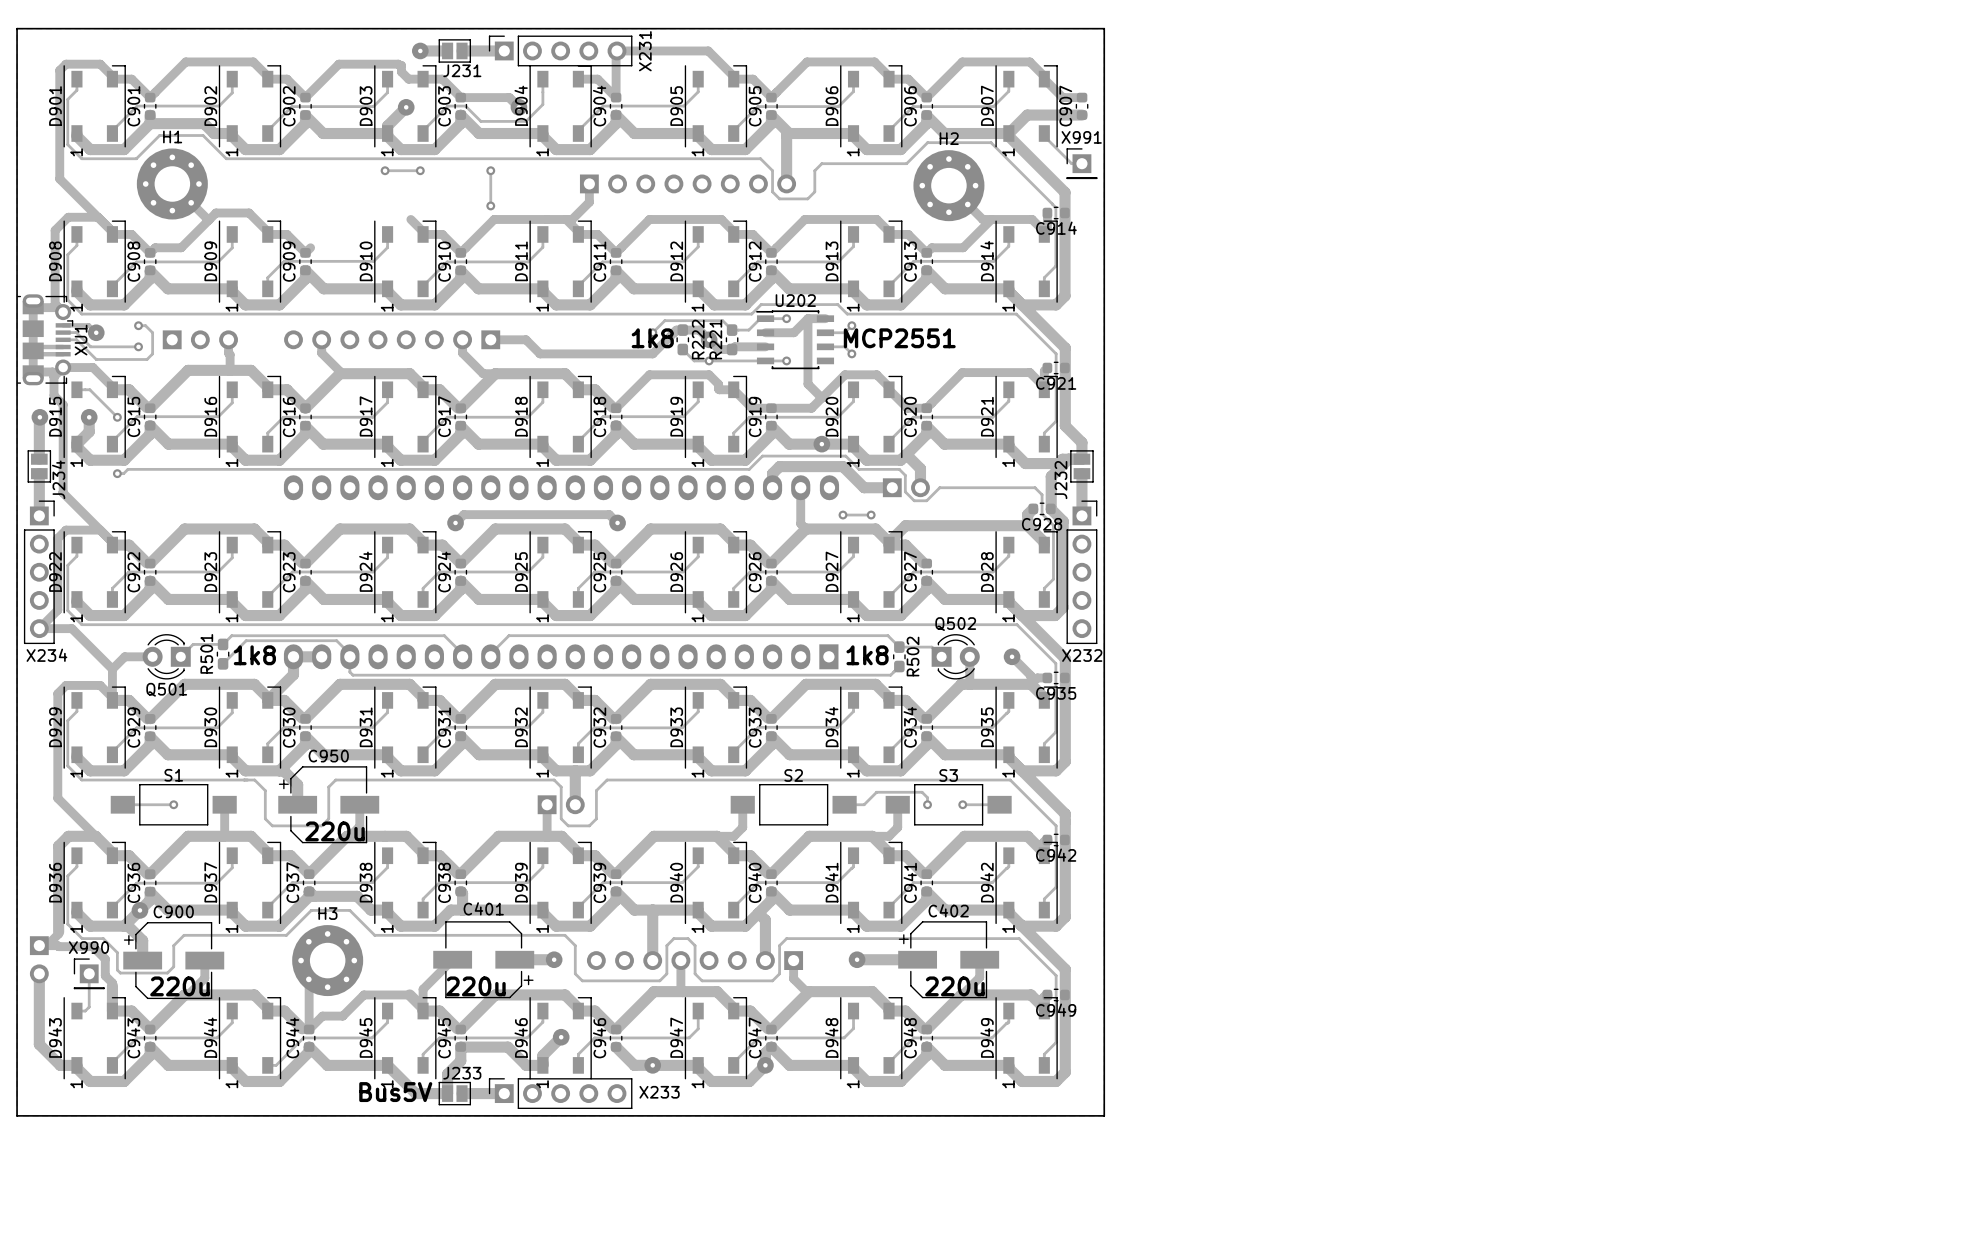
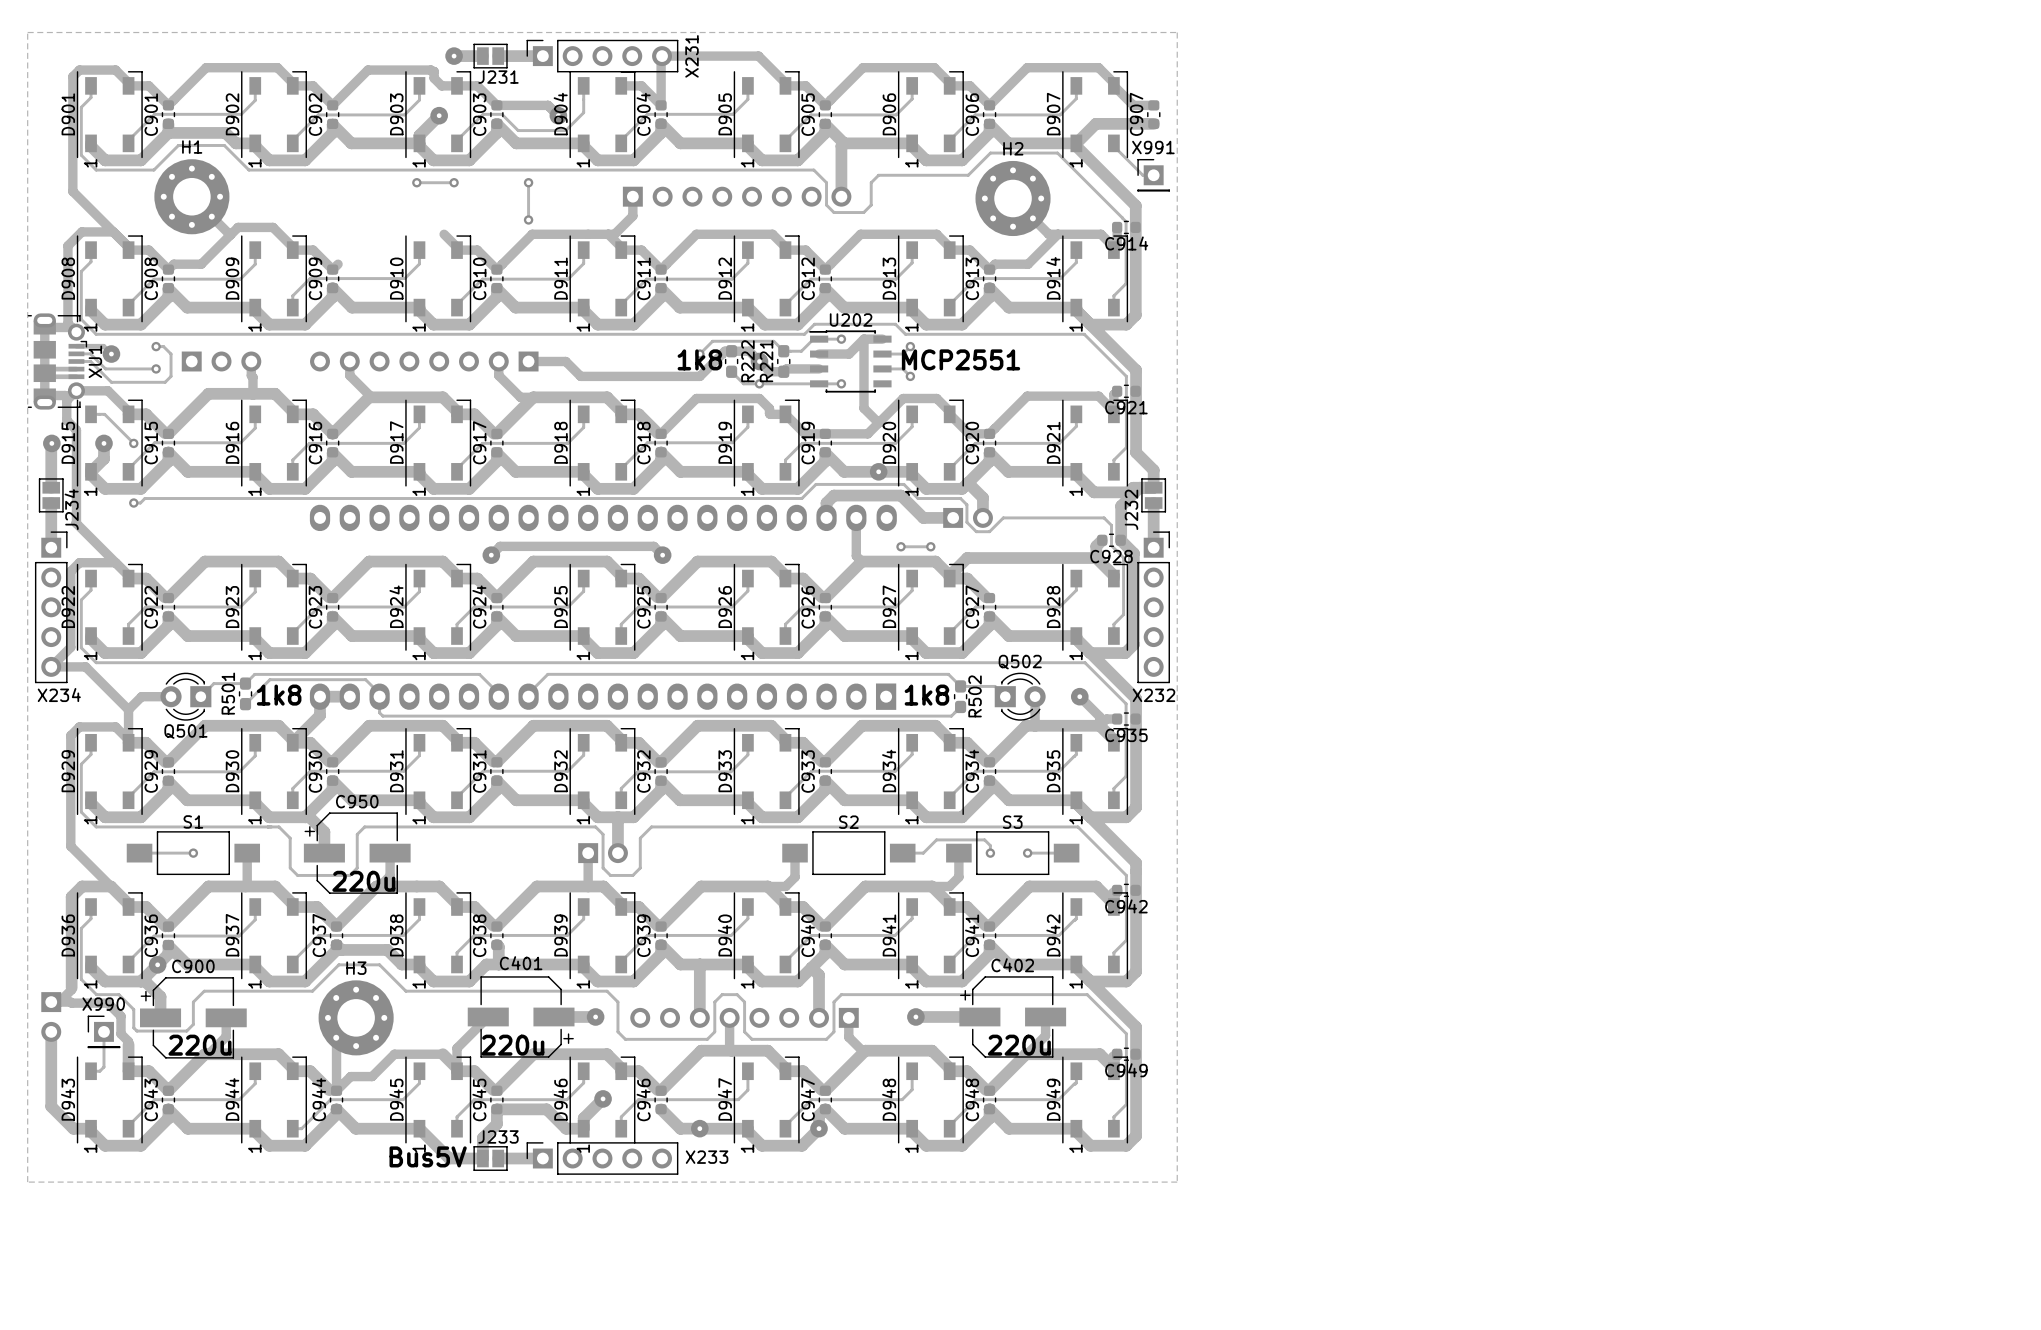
board edge: (17, 28) (1104, 28) (1104, 1115) (17, 1115) (17, 28) -> none

